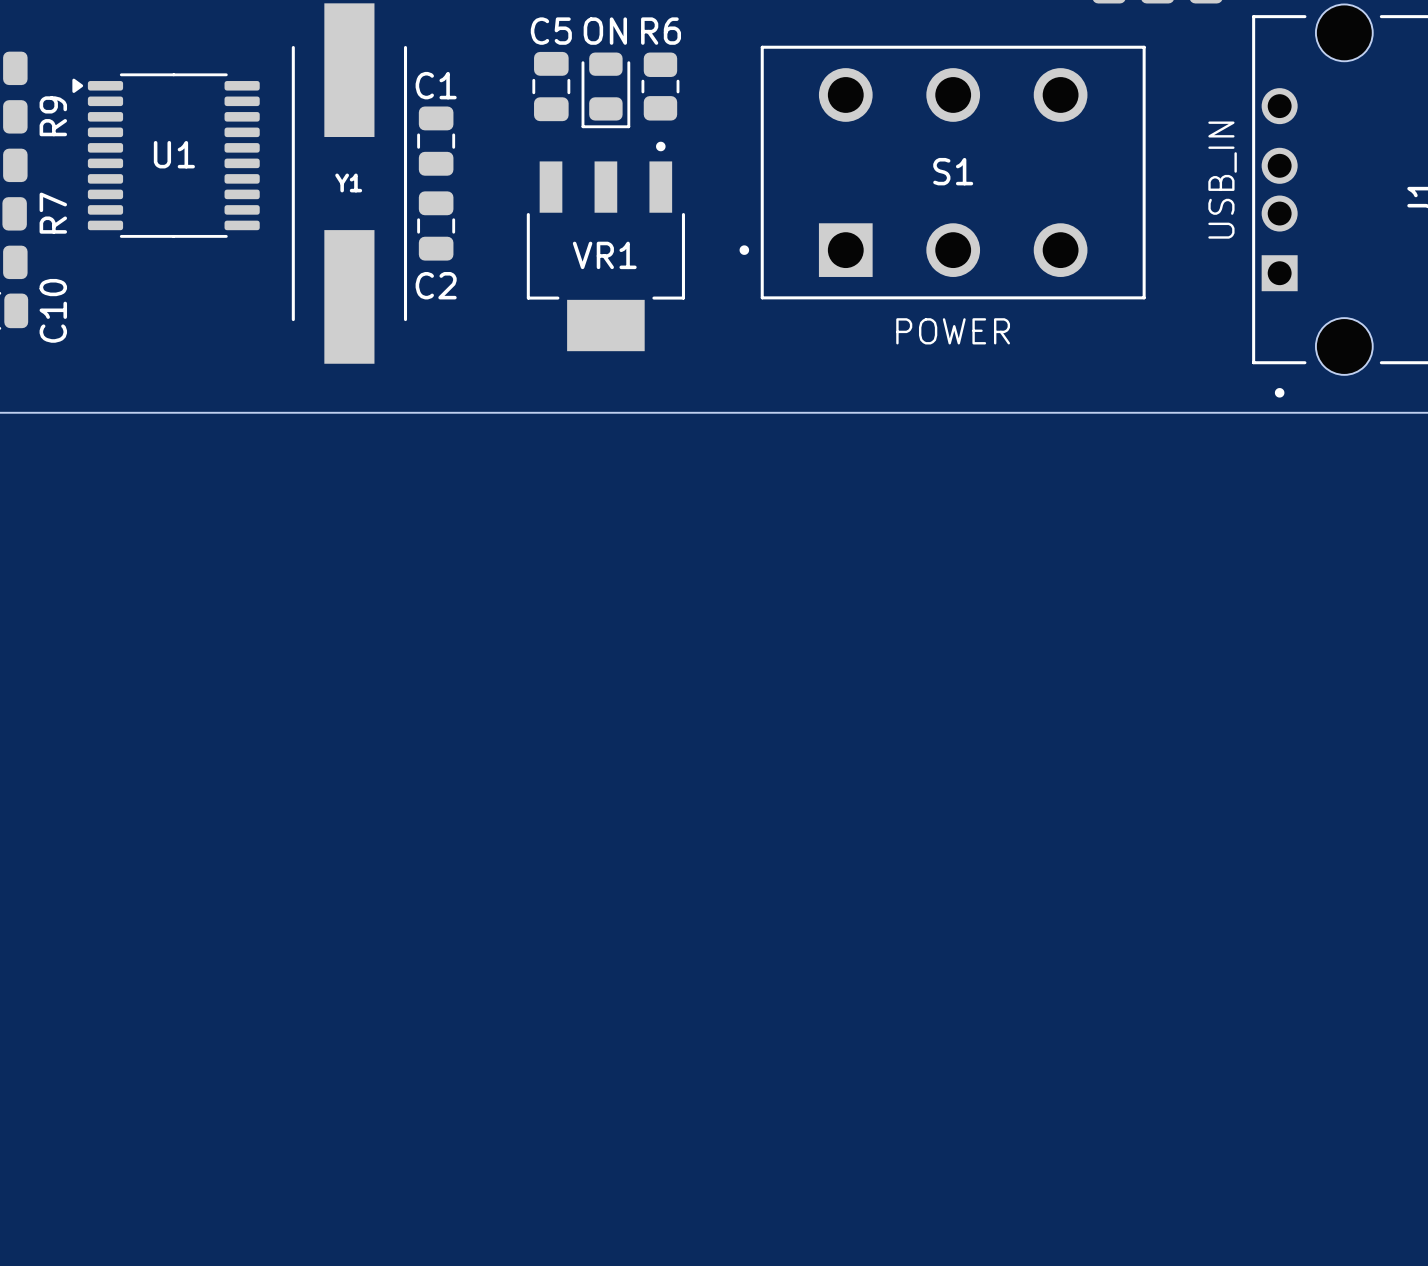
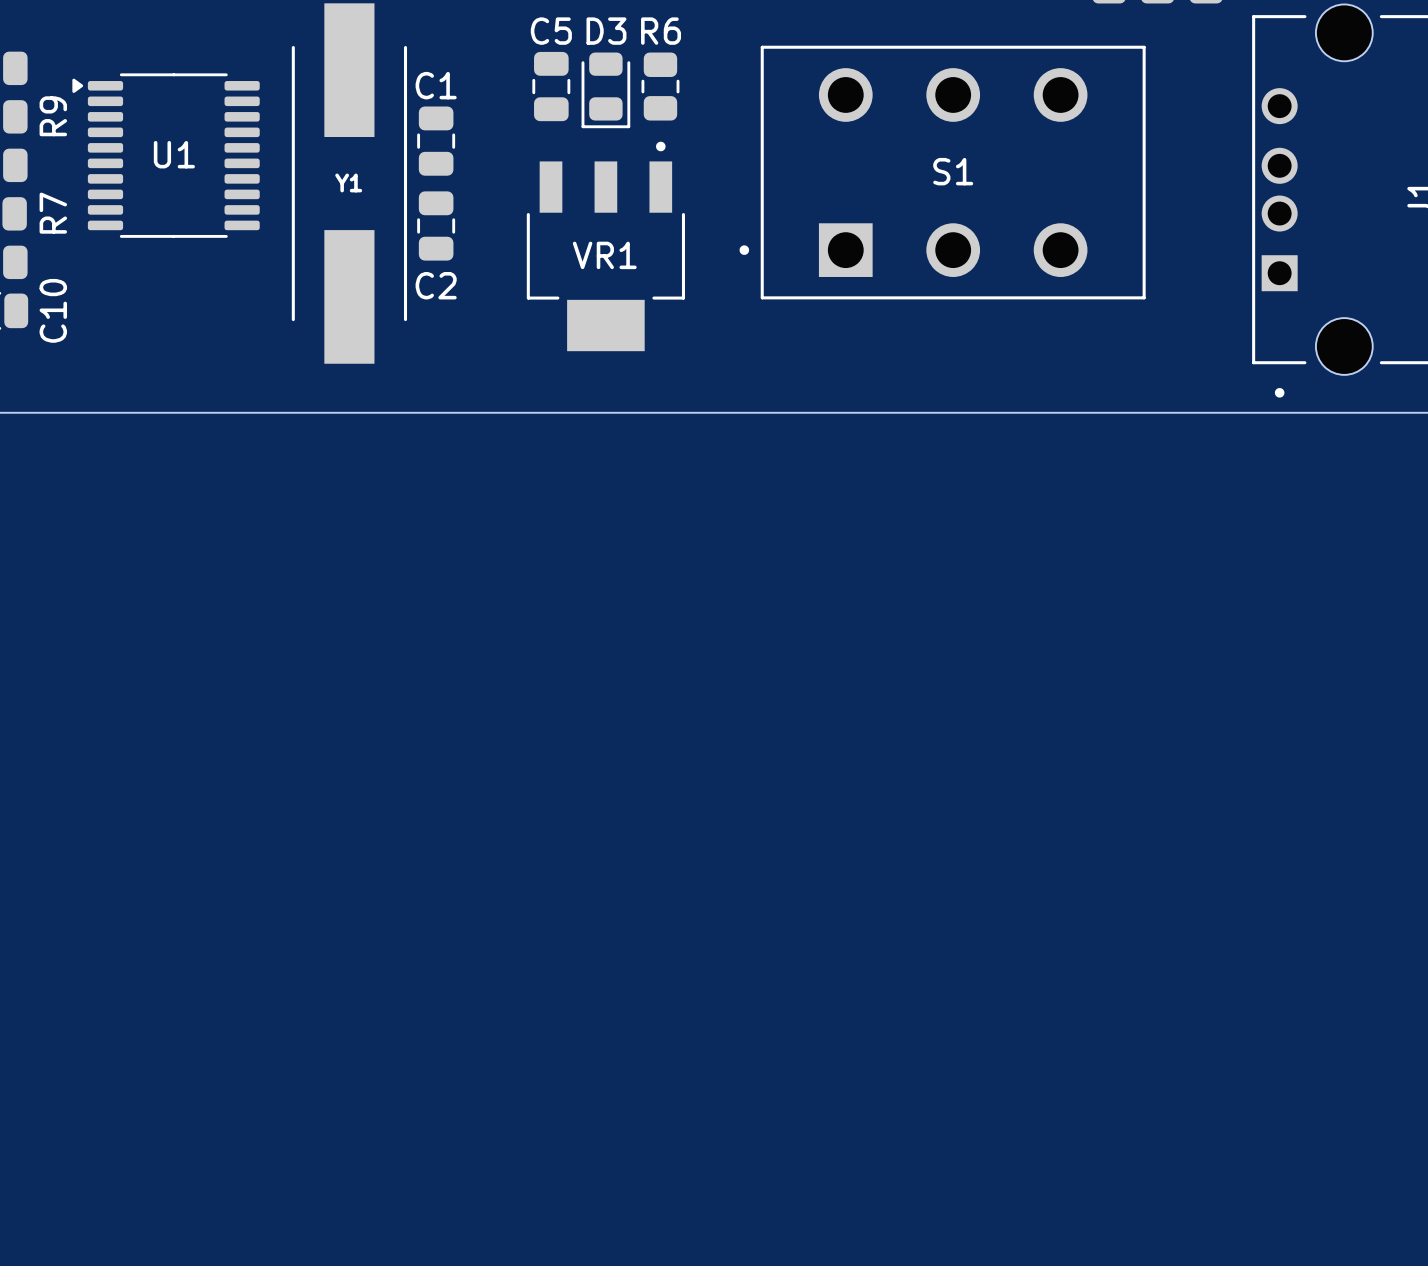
ON name: ON (605, 31) -> D3 (606, 31)
text: USB_IN (1222, 180) -> none
text: POWER (953, 331) -> none

